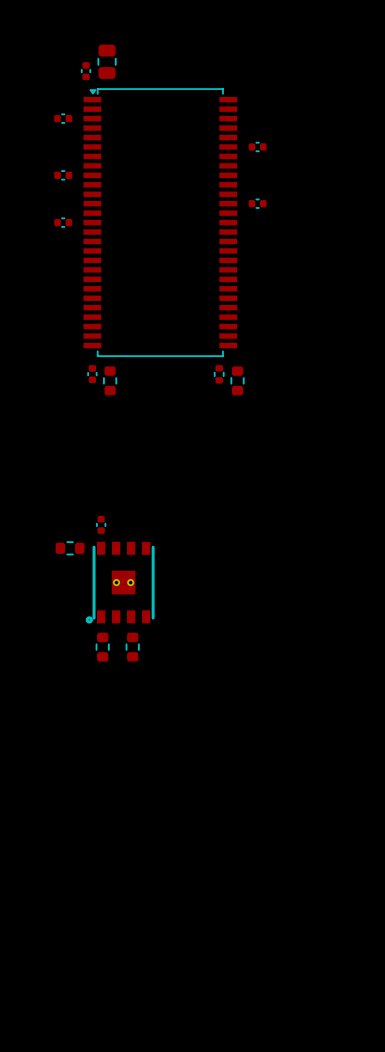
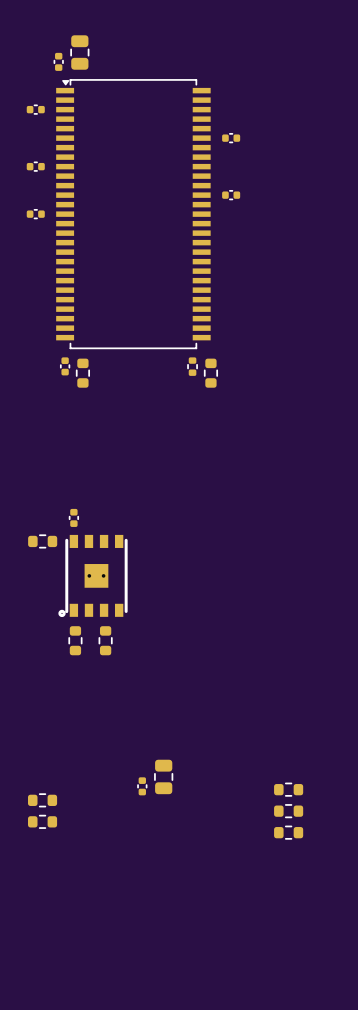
part: none -> (163, 776)
part: none -> (142, 786)
part: none -> (288, 789)
part: none -> (42, 800)
part: none -> (288, 811)
part: none -> (42, 821)
part: none -> (288, 832)

